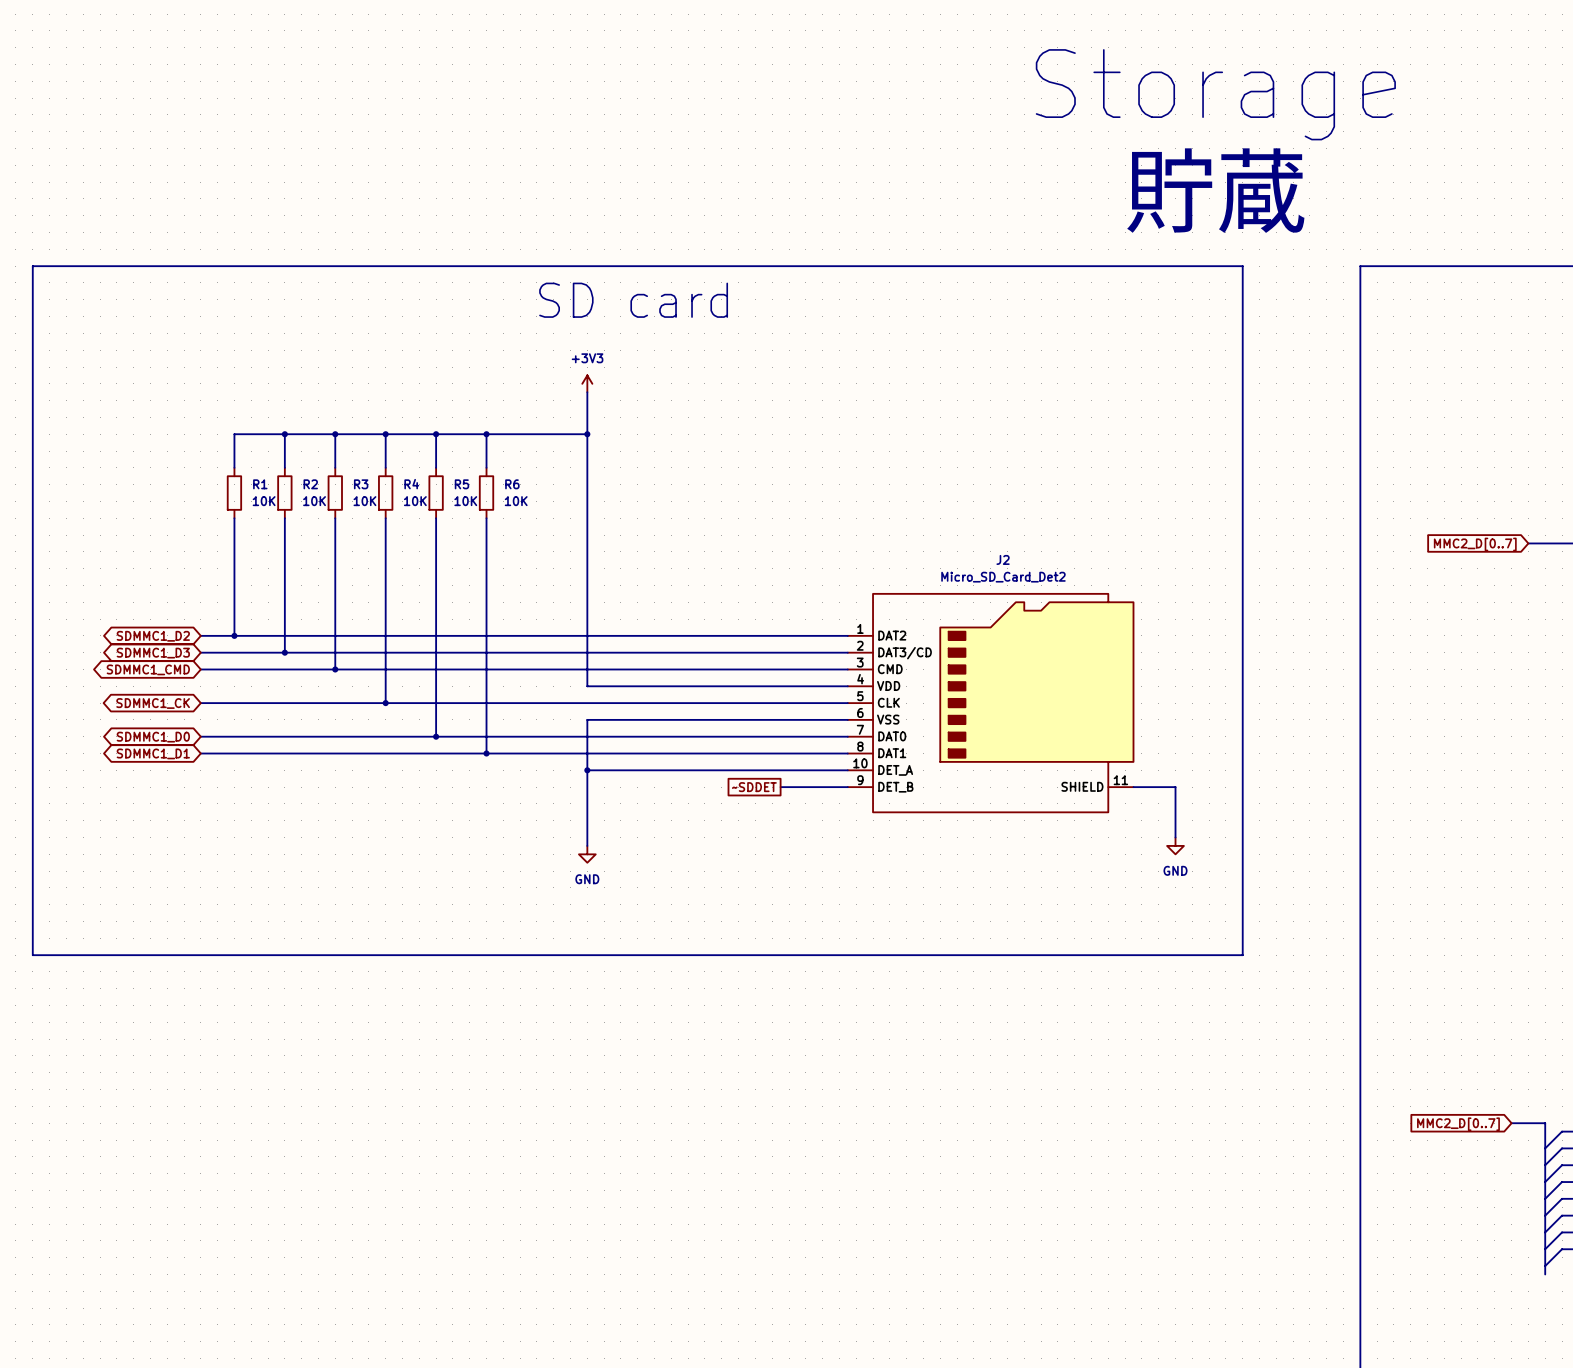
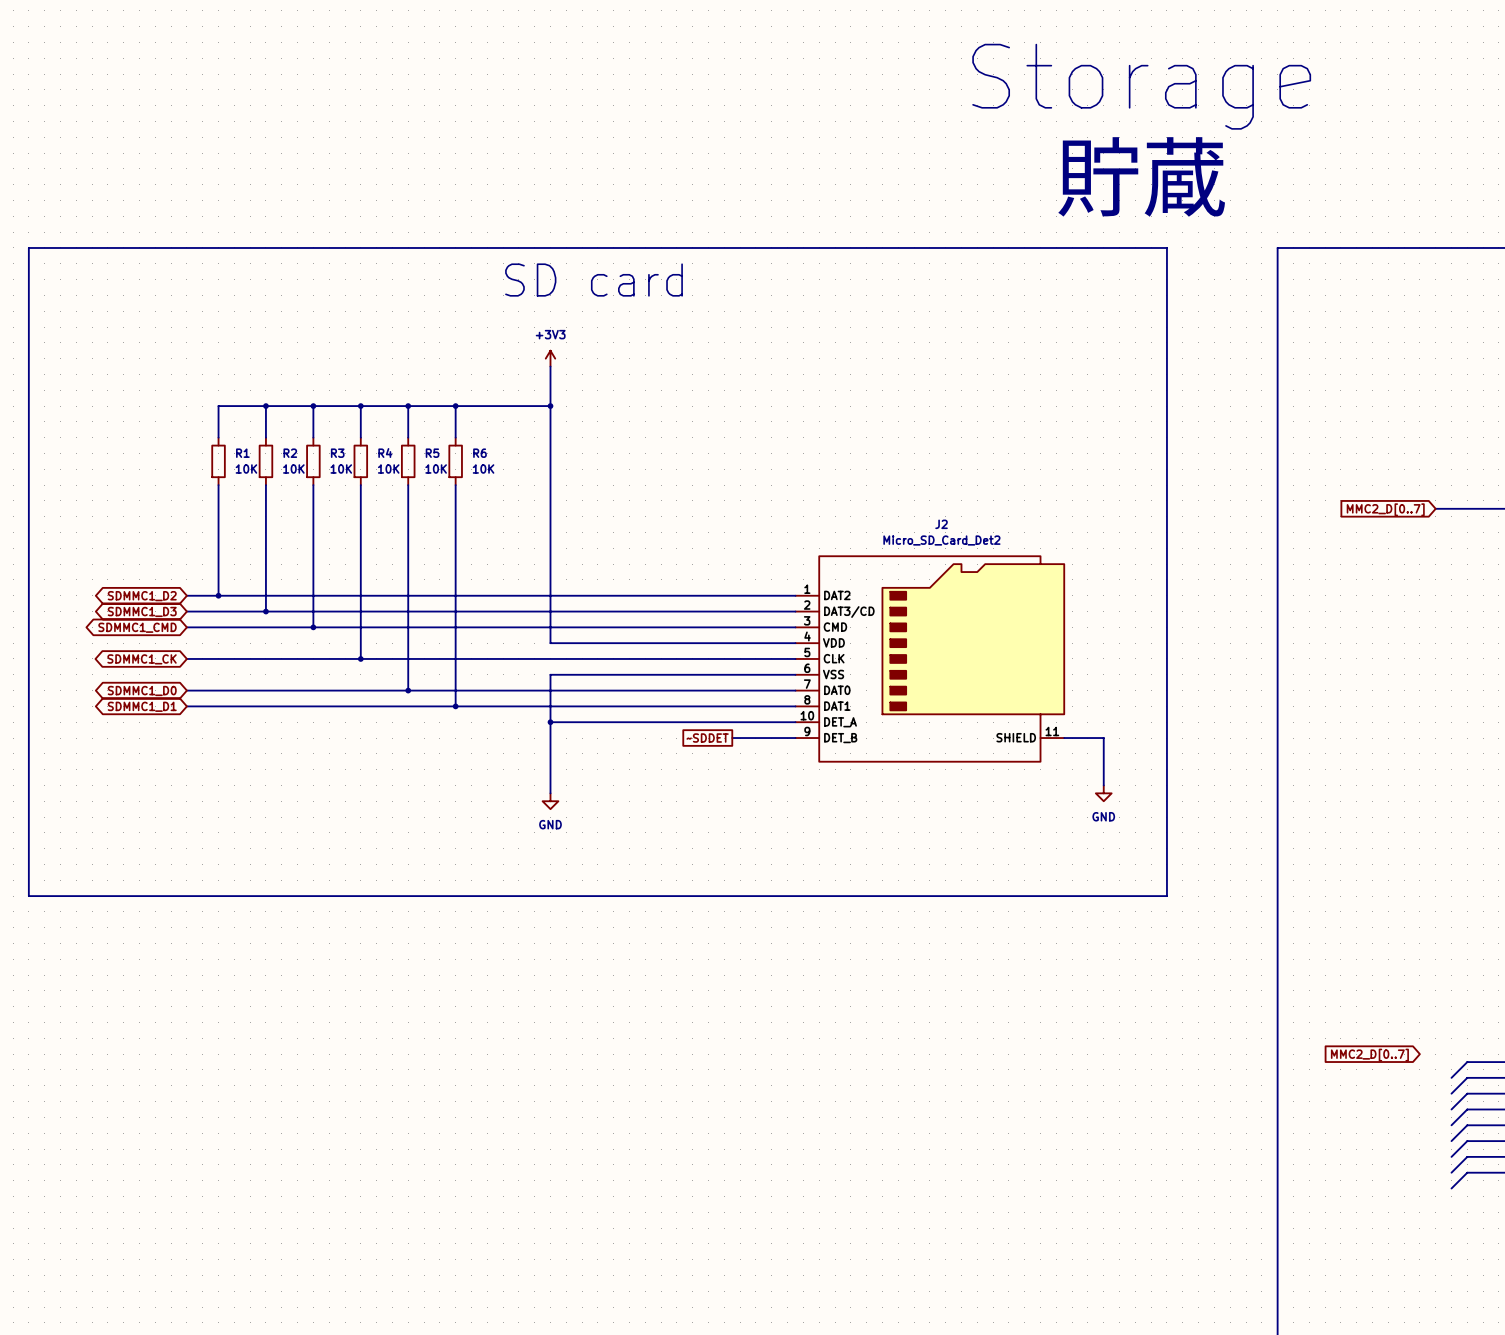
bus: (1511, 1123) (1545, 1123) (1545, 1274) -> none

